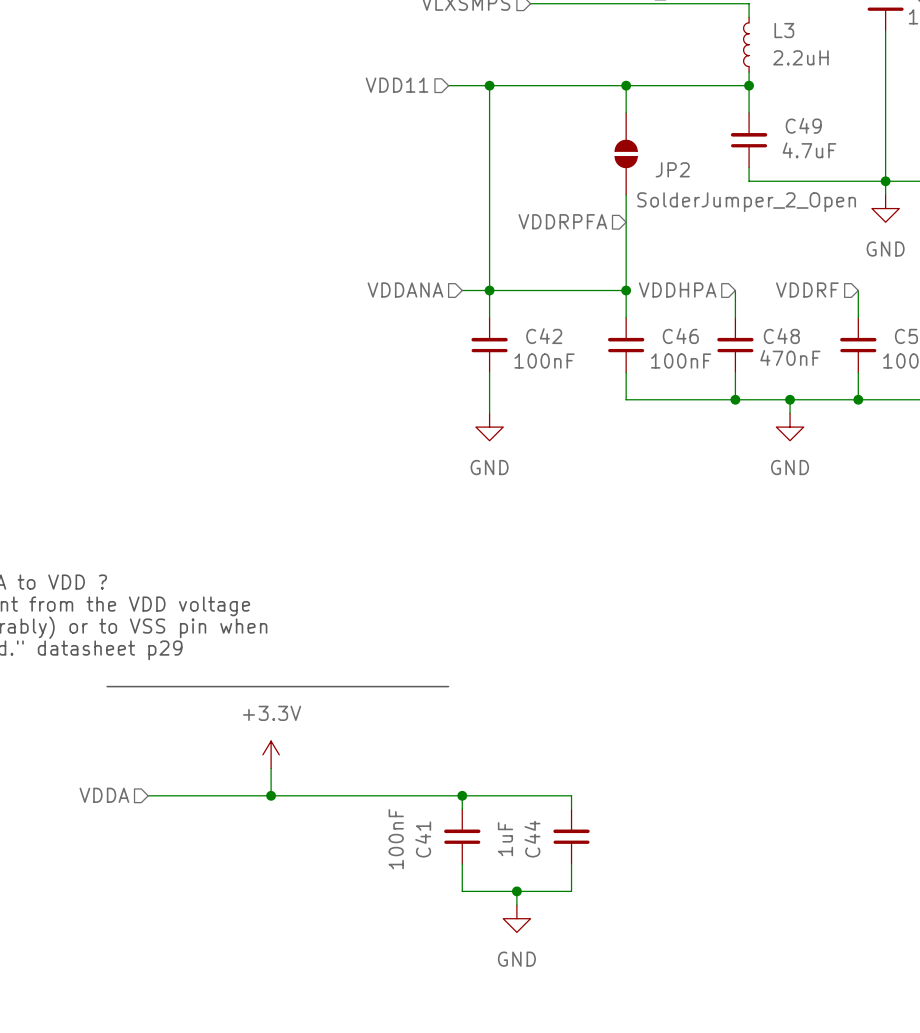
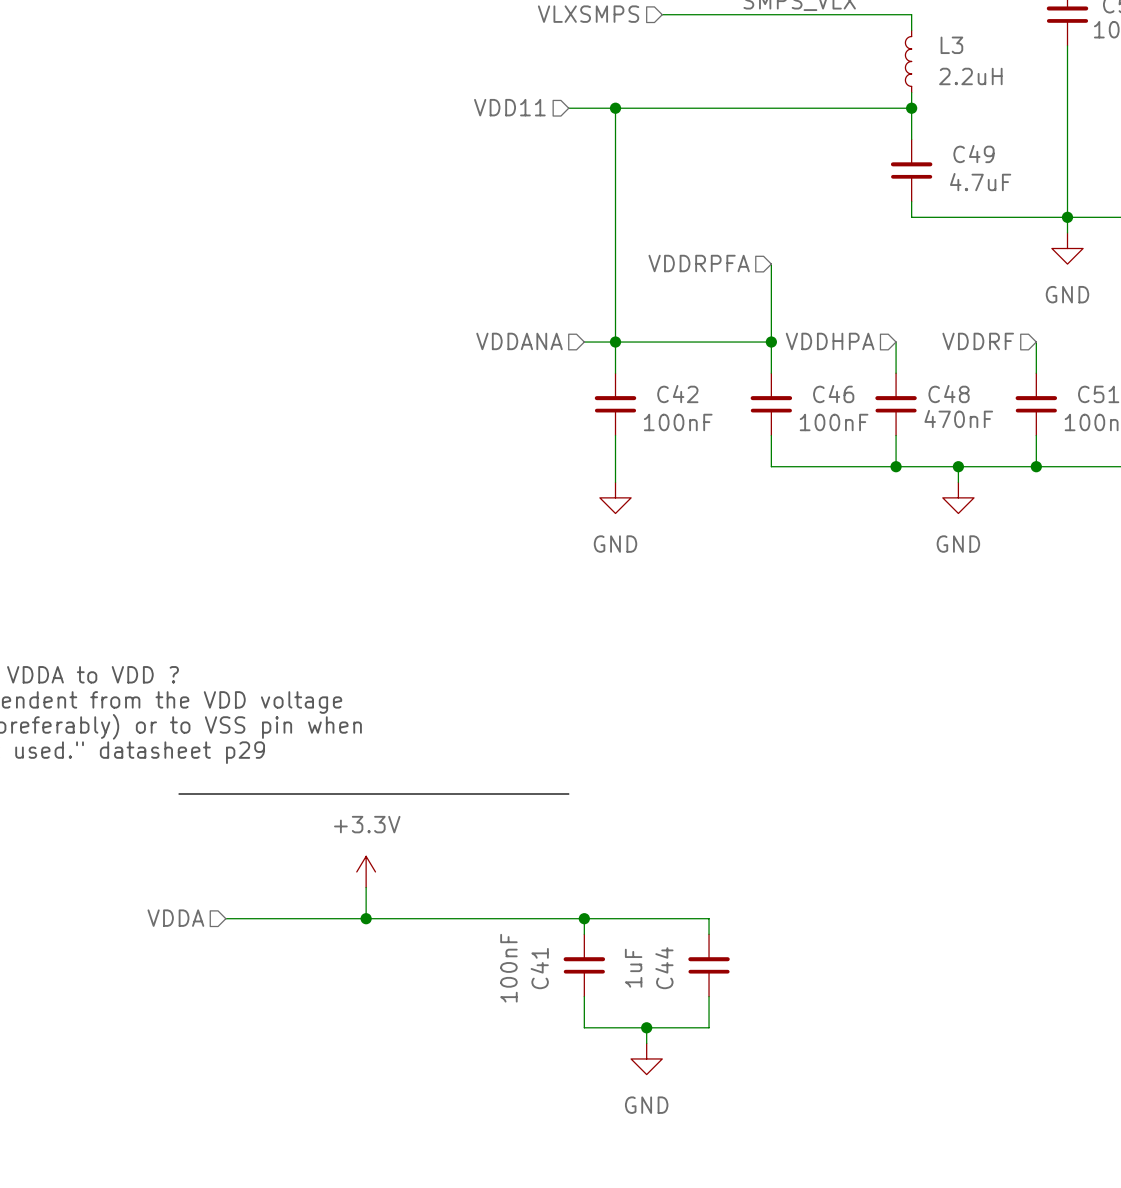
wire: (626, 85) (626, 112) -> none
junction: (626, 85) -> none
JP2: SolderJumper_2_Open (626, 153) -> none
wire: (626, 194) (626, 222) -> none

